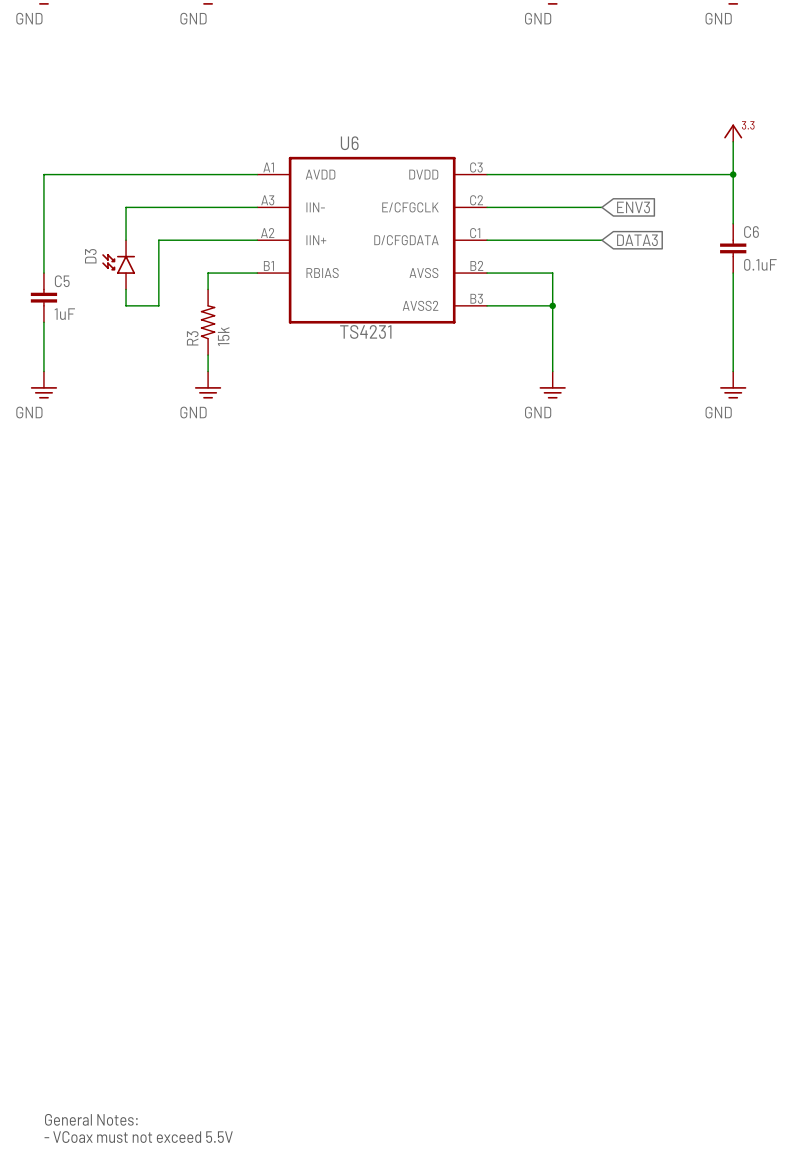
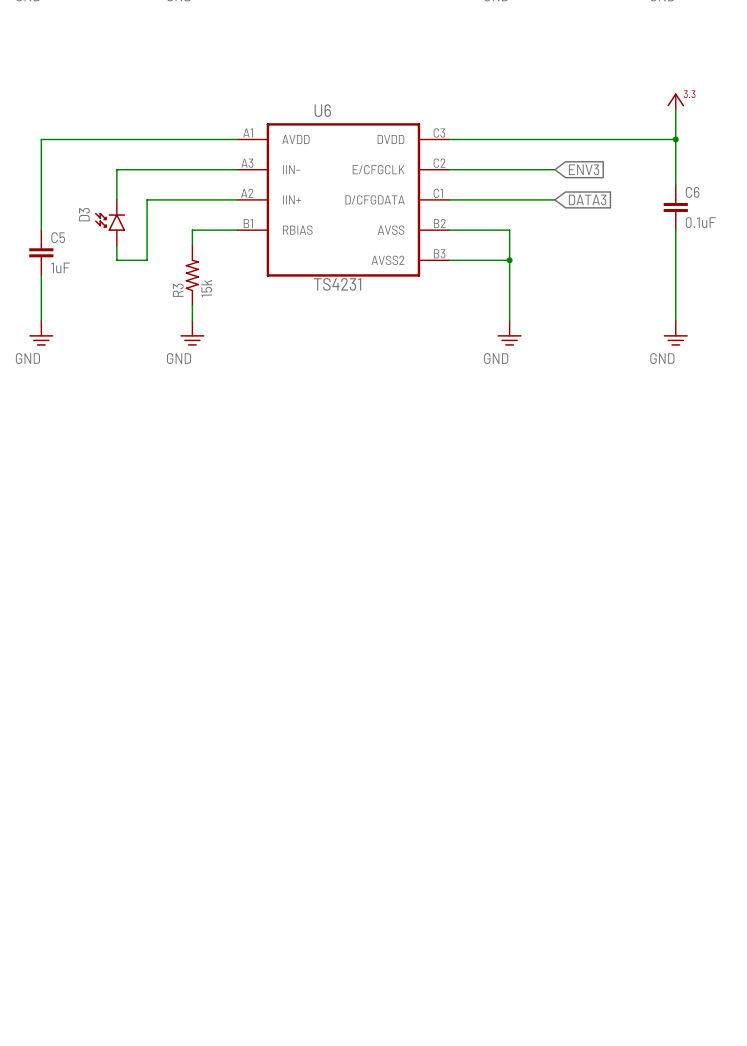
text: General Notes: (91, 1119) -> none
text: - VCoax must not exceed 5.5V (138, 1137) -> none

